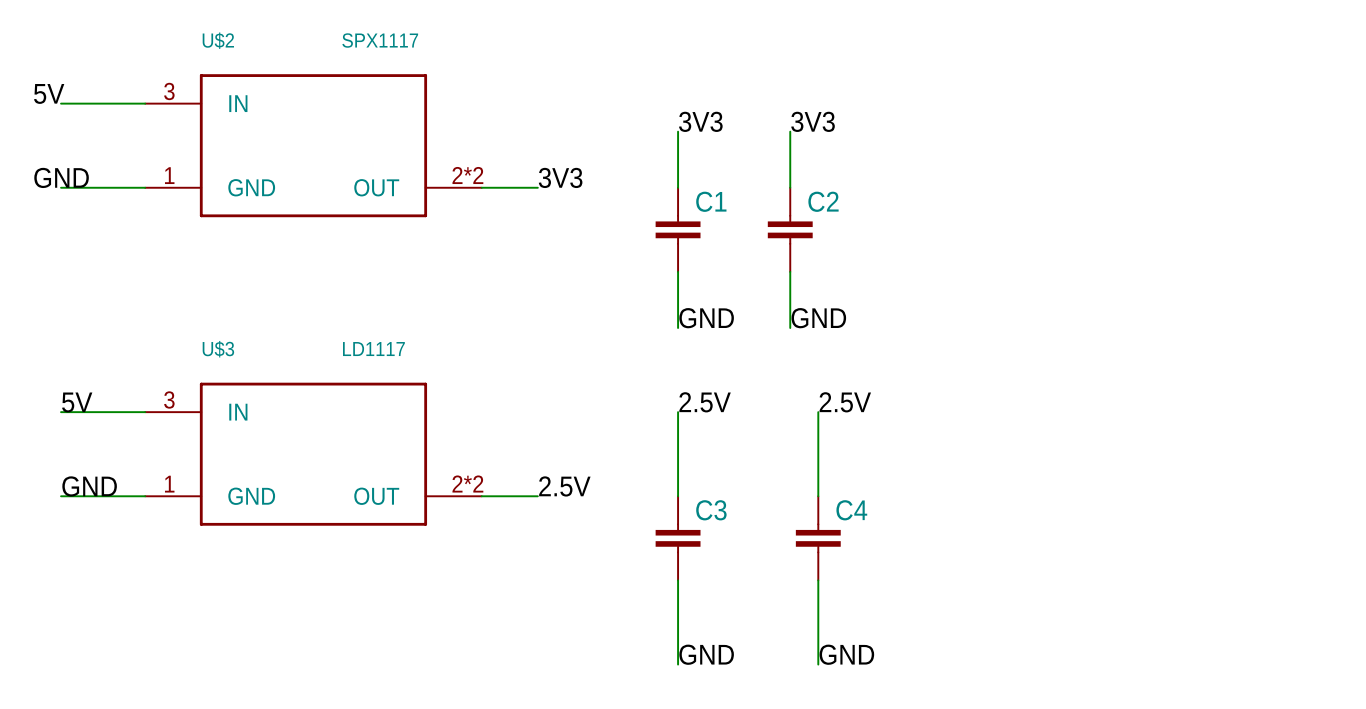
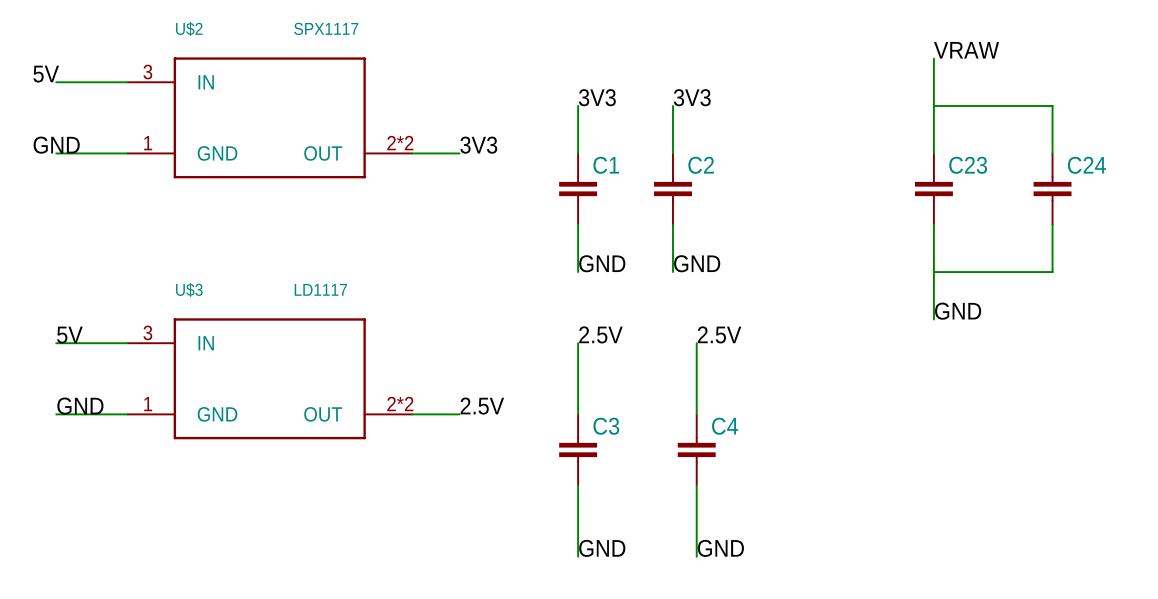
label: none -> VRAW (966, 50)
wire: none -> (933, 58) (933, 153)
wire: none -> (933, 106) (1052, 106) (1052, 153)
C23: none -> (933, 189)
C24: none -> (1052, 189)
wire: none -> (933, 224) (933, 319)
wire: none -> (1052, 224) (1052, 272) (933, 272)
label: none -> GND (958, 311)

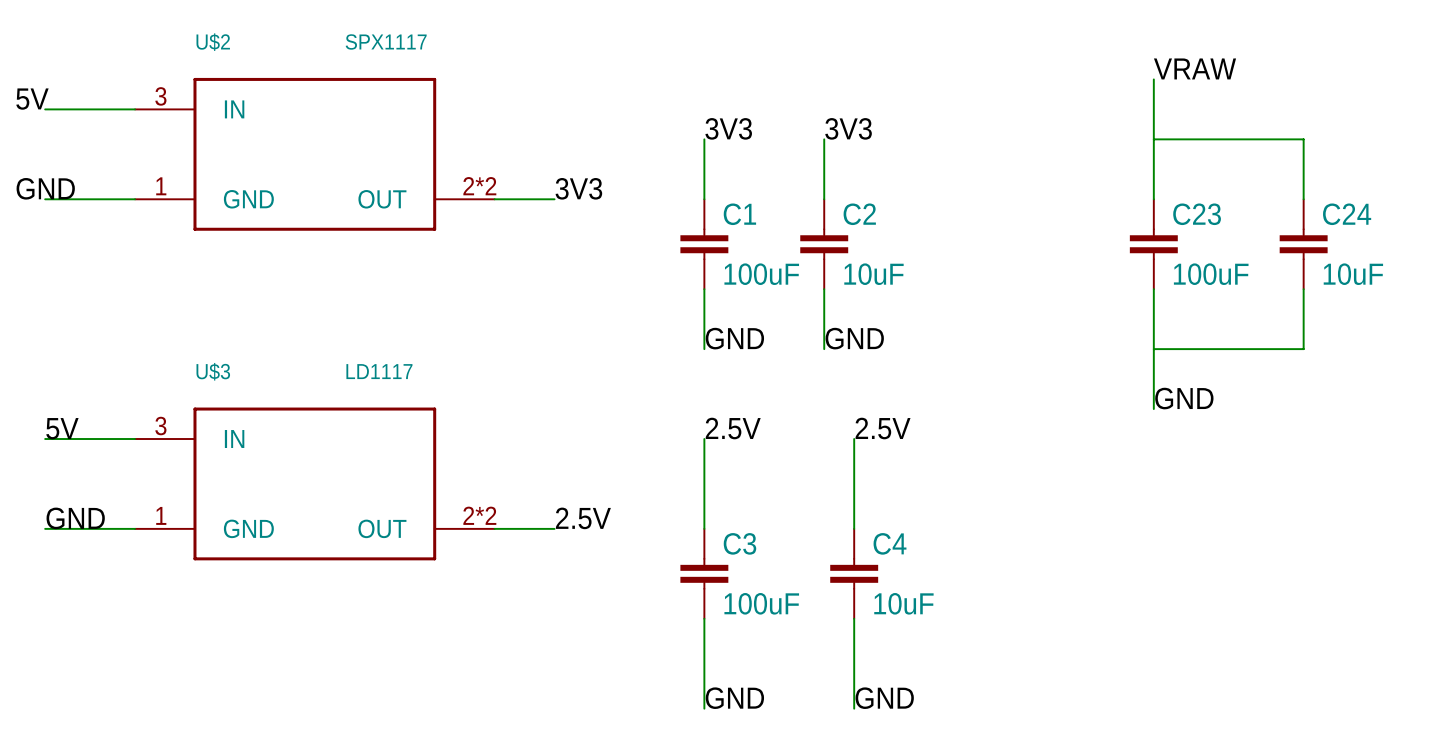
C1 value: none -> 100uF (761, 274)
C2 value: none -> 10uF (873, 274)
C23 value: none -> 100uF (1211, 274)
C24 value: none -> 10uF (1353, 274)
C3 value: none -> 100uF (761, 603)
C4 value: none -> 10uF (903, 603)

